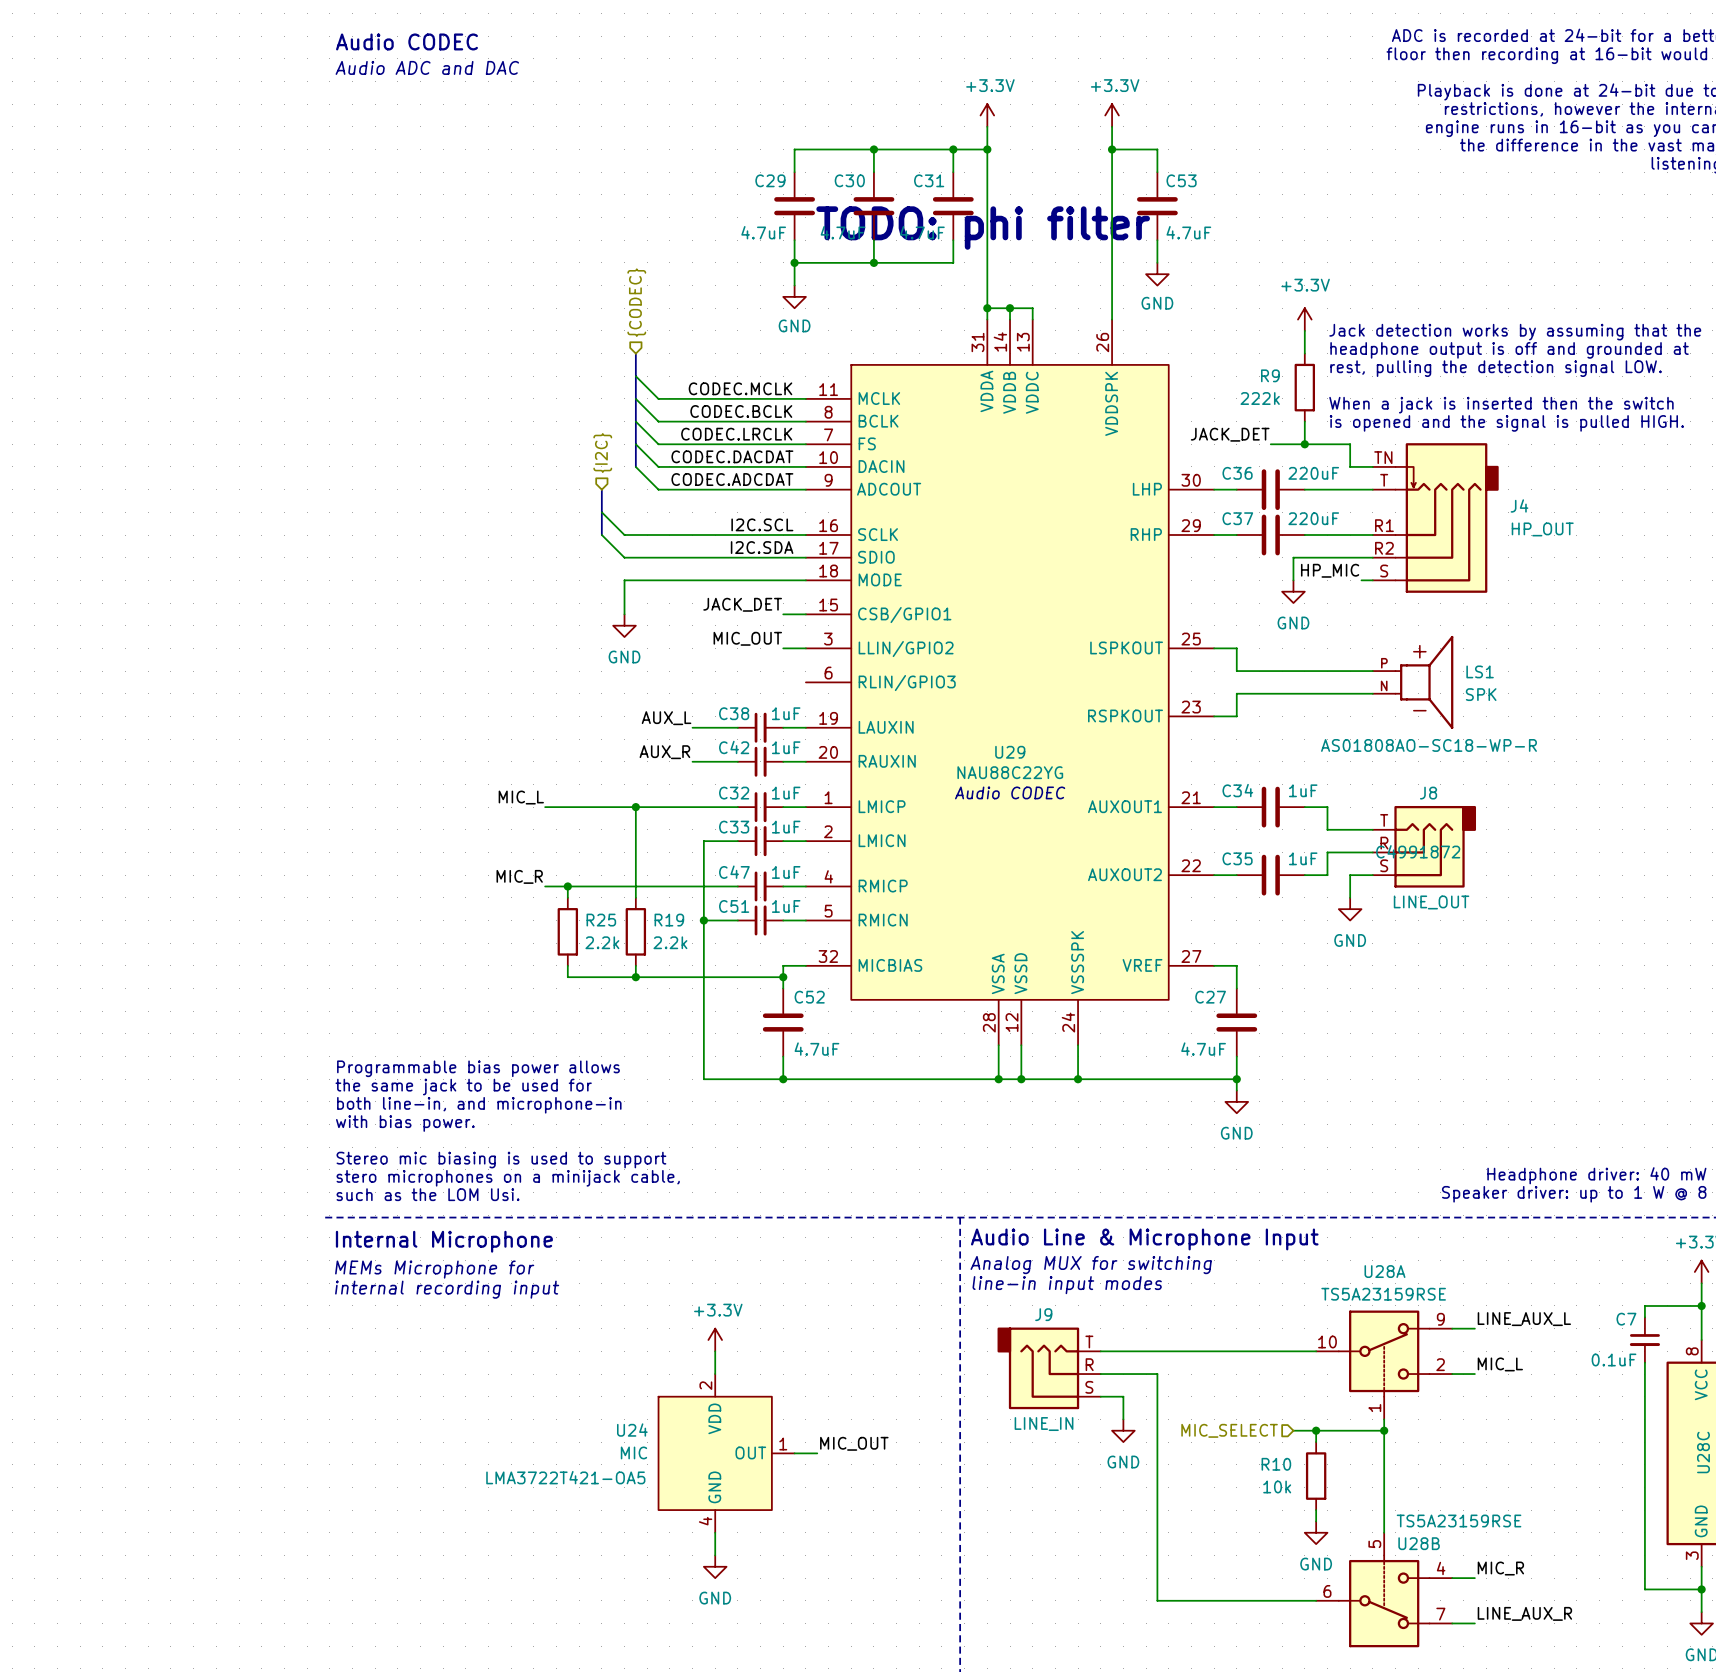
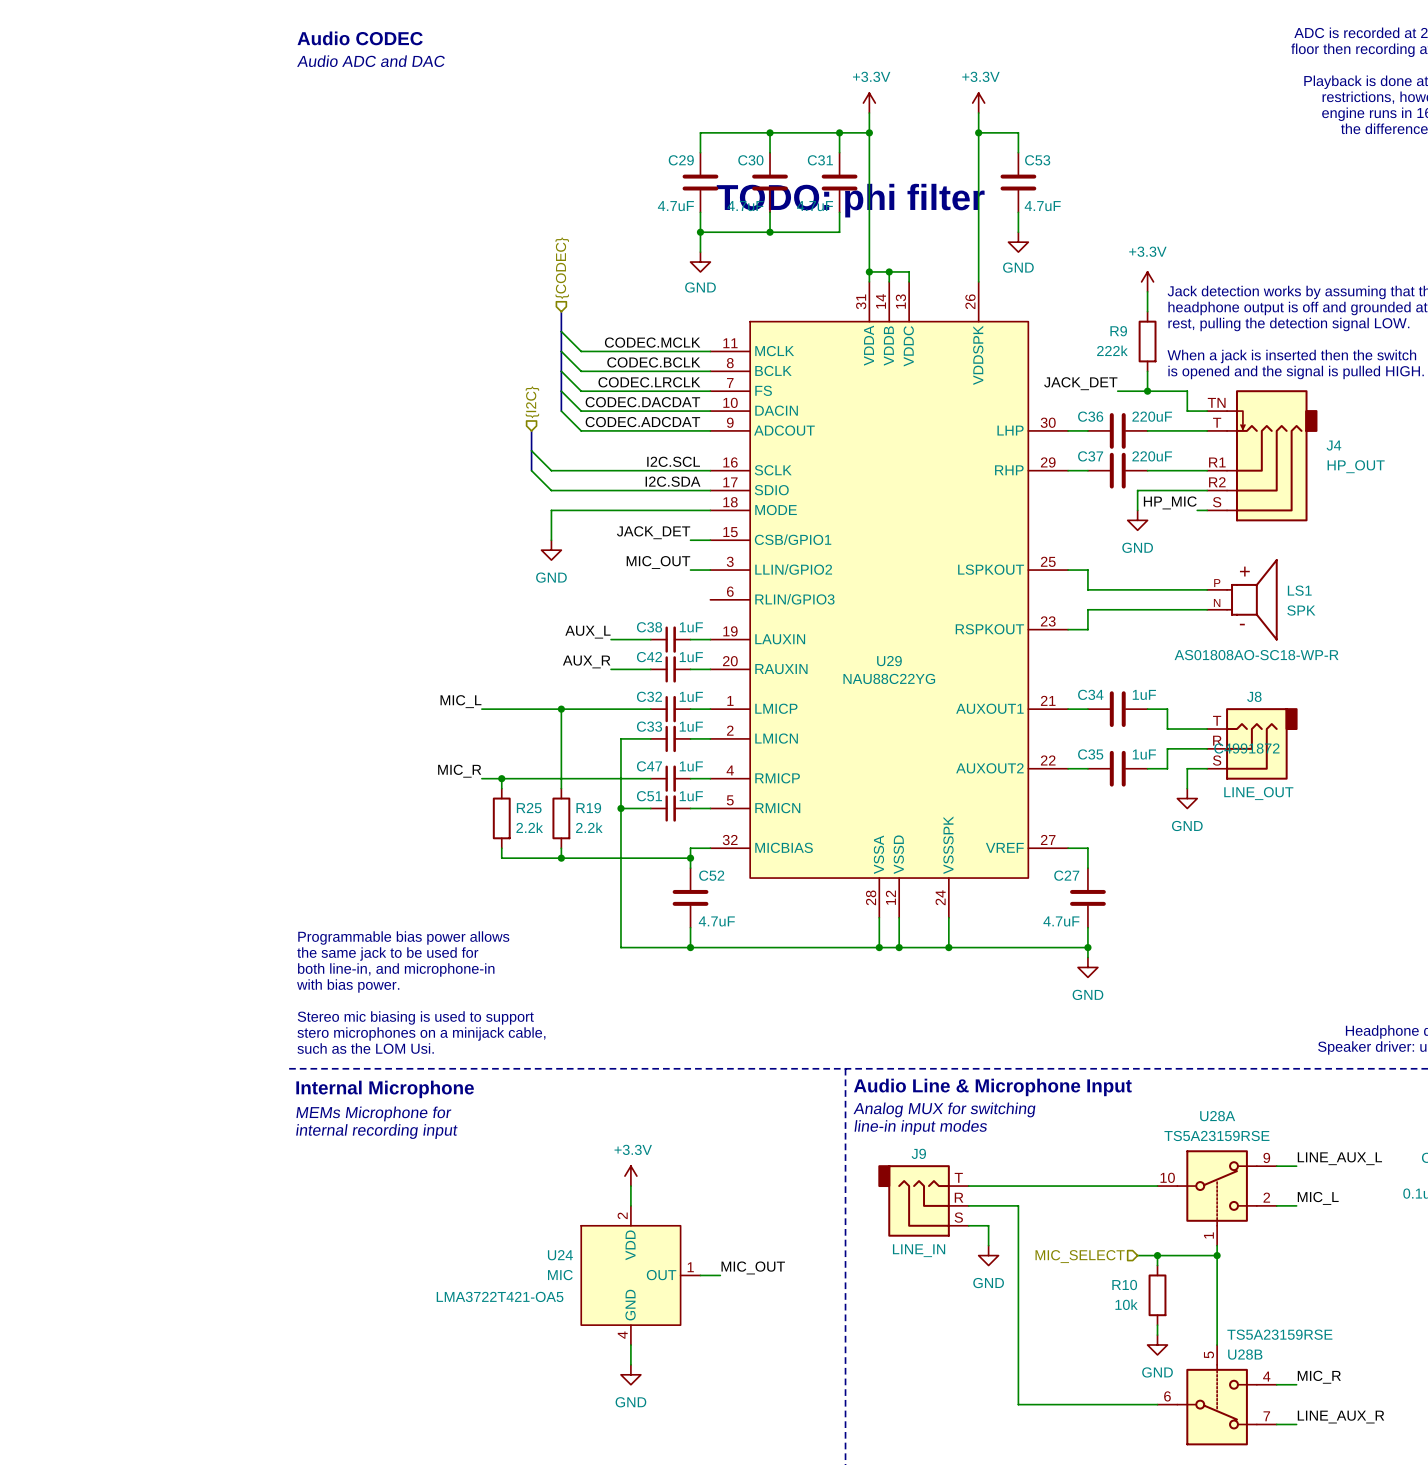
text: Audio CODEC (1010, 792) -> none

